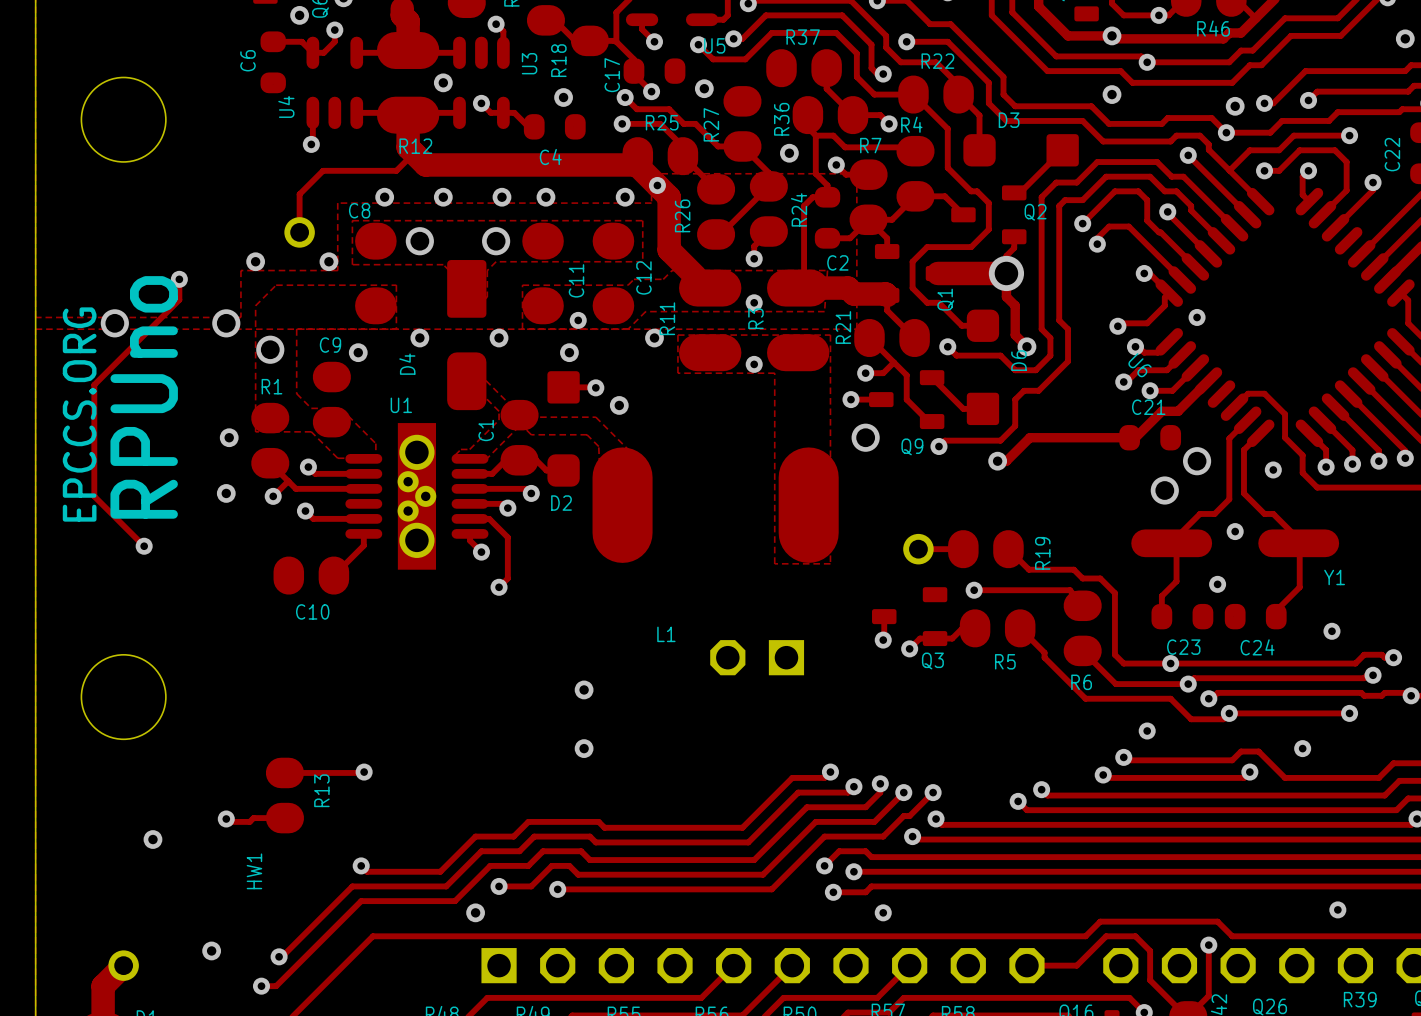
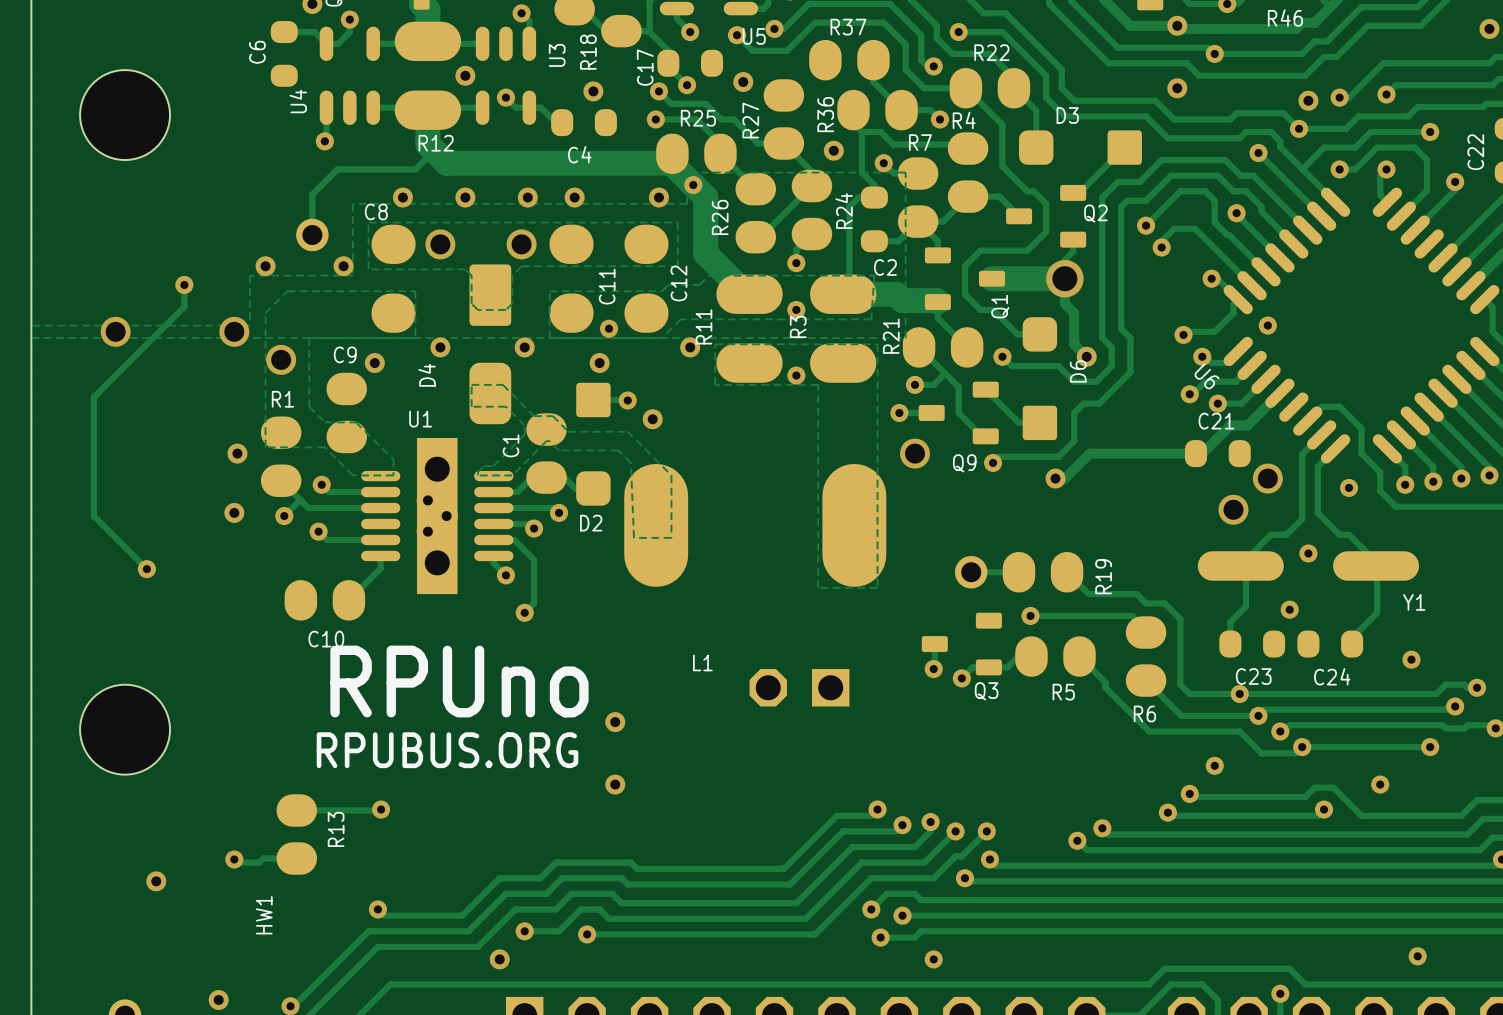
text rotation: 0° (144, 397) -> 90° clockwise (459, 681)
text position: RPUno (144, 397) -> RPUno (459, 681)
text: EPCCS.ORG (79, 414) -> none
text: none -> RPUBUS.ORG (447, 750)

